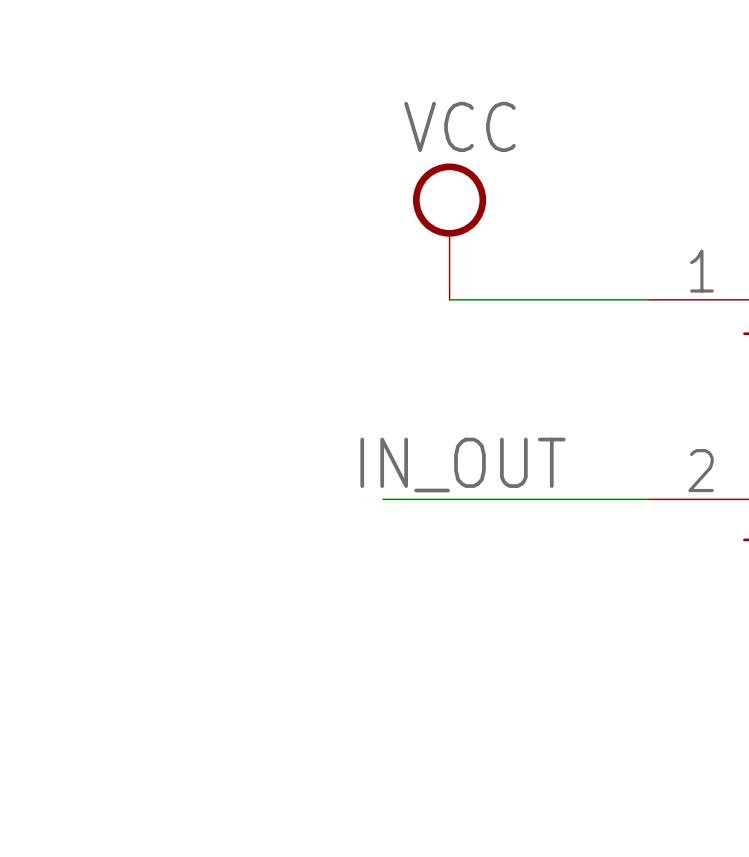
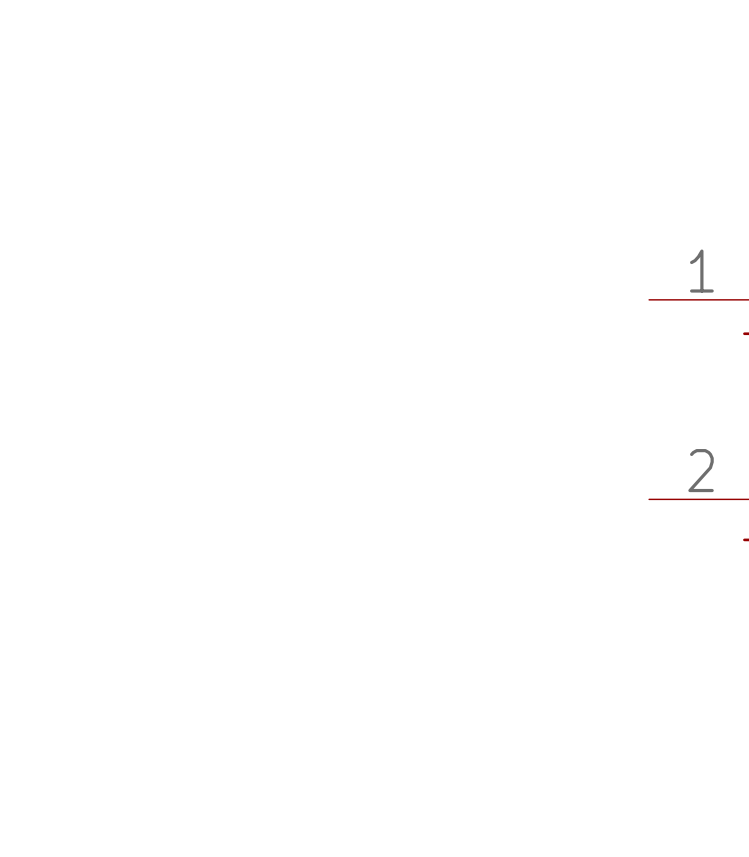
power symbol: VCC (449, 231) -> none
wire: (449, 299) (649, 299) -> none
label: IN_OUT (462, 465) -> none
wire: (383, 499) (649, 499) -> none

